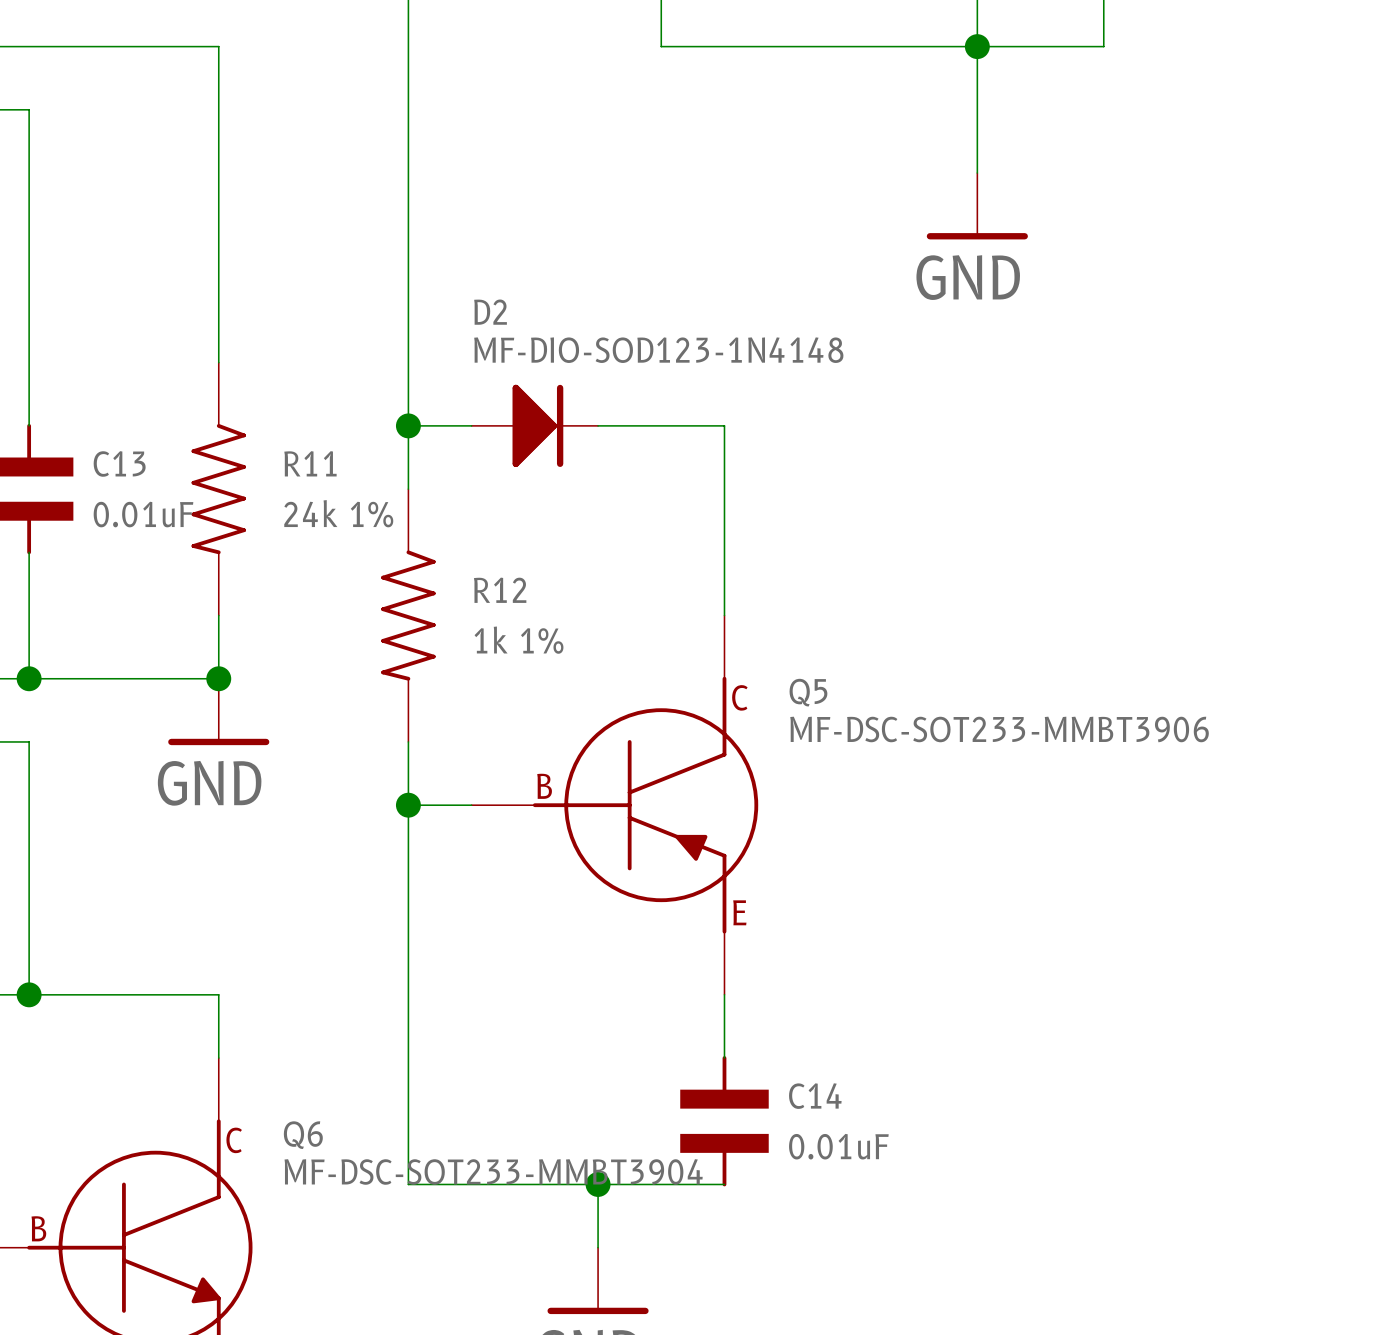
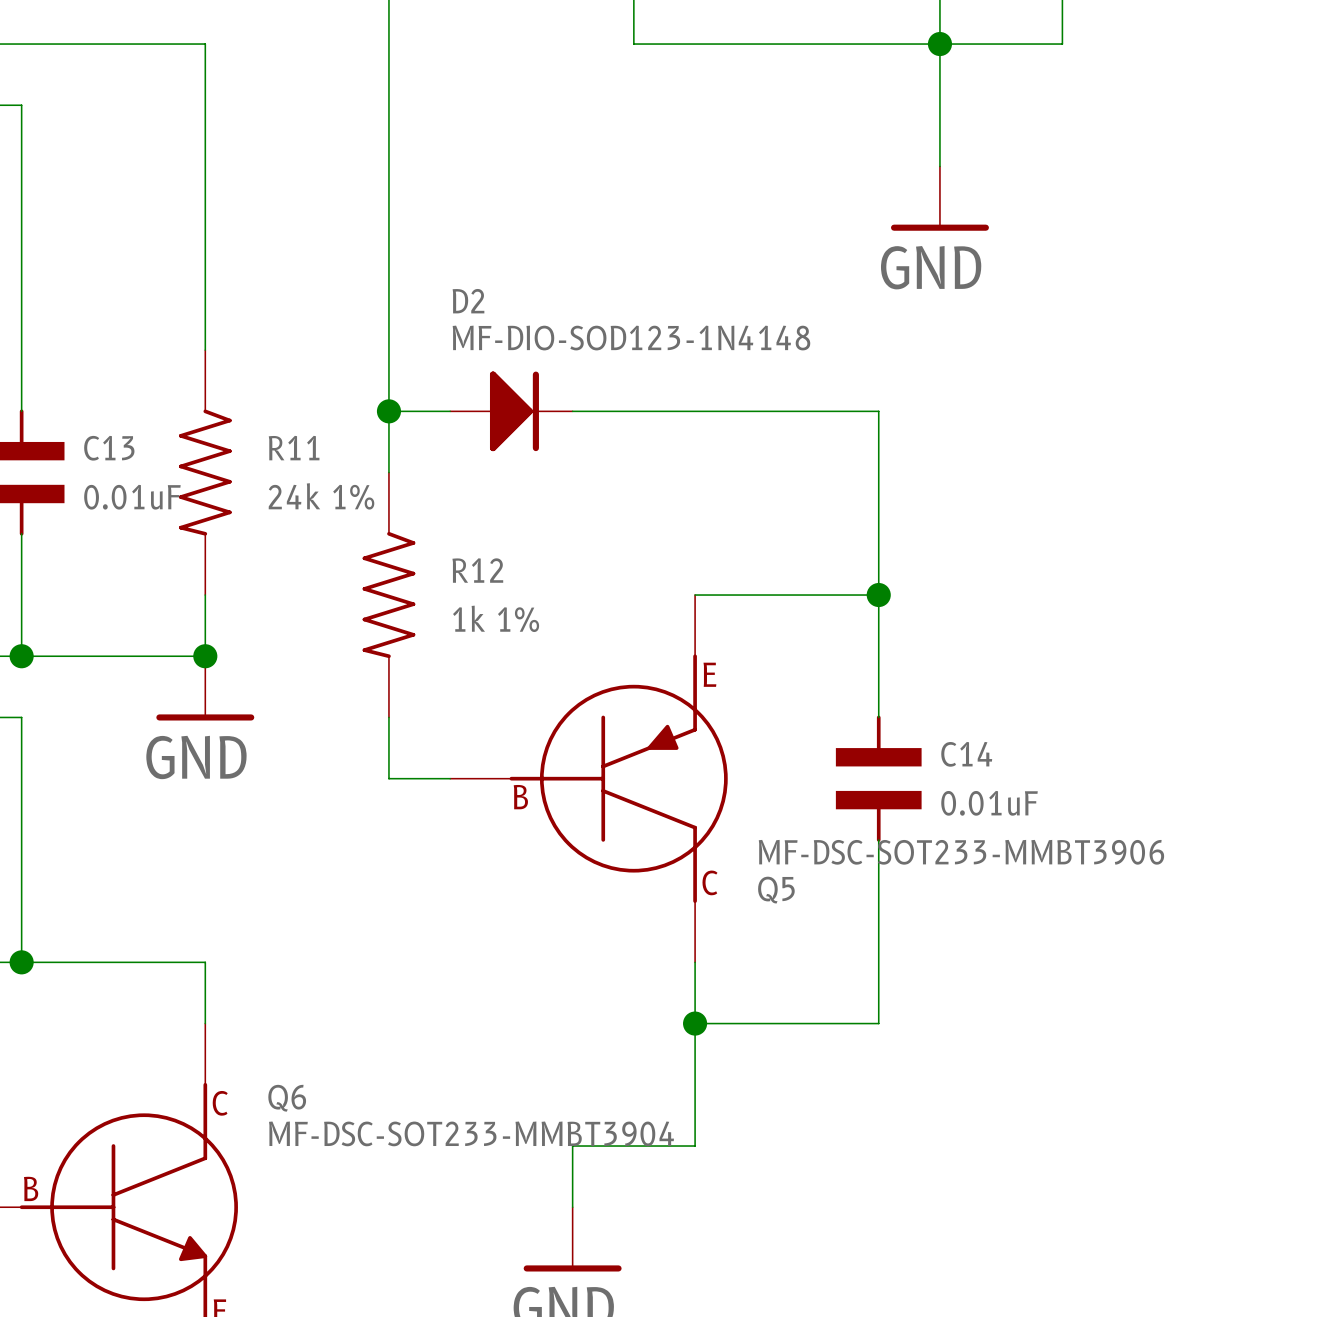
wire: (724, 425) (724, 615) -> (695, 411) (878, 411) (878, 717)
Q5 symbol: [471, 615, 759, 995] -> [450, 595, 728, 963]
wire: none -> (695, 595) (878, 595)
junction: none -> (878, 595)
Q5 name position: Q5 (808, 692) -> Q5 (776, 890)
Q5 value position: MF-DSC-SOT233-MMBT3906 (999, 729) -> MF-DSC-SOT233-MMBT3906 (961, 852)
wire: (408, 805) (408, 1184) (598, 1184) -> none
junction: (408, 805) -> none
wire: none -> (878, 839) (878, 1023) (695, 1023) (695, 1146)
junction: none -> (695, 1023)
C14 position: (724, 1121) -> (878, 778)
junction: (598, 1184) -> none

